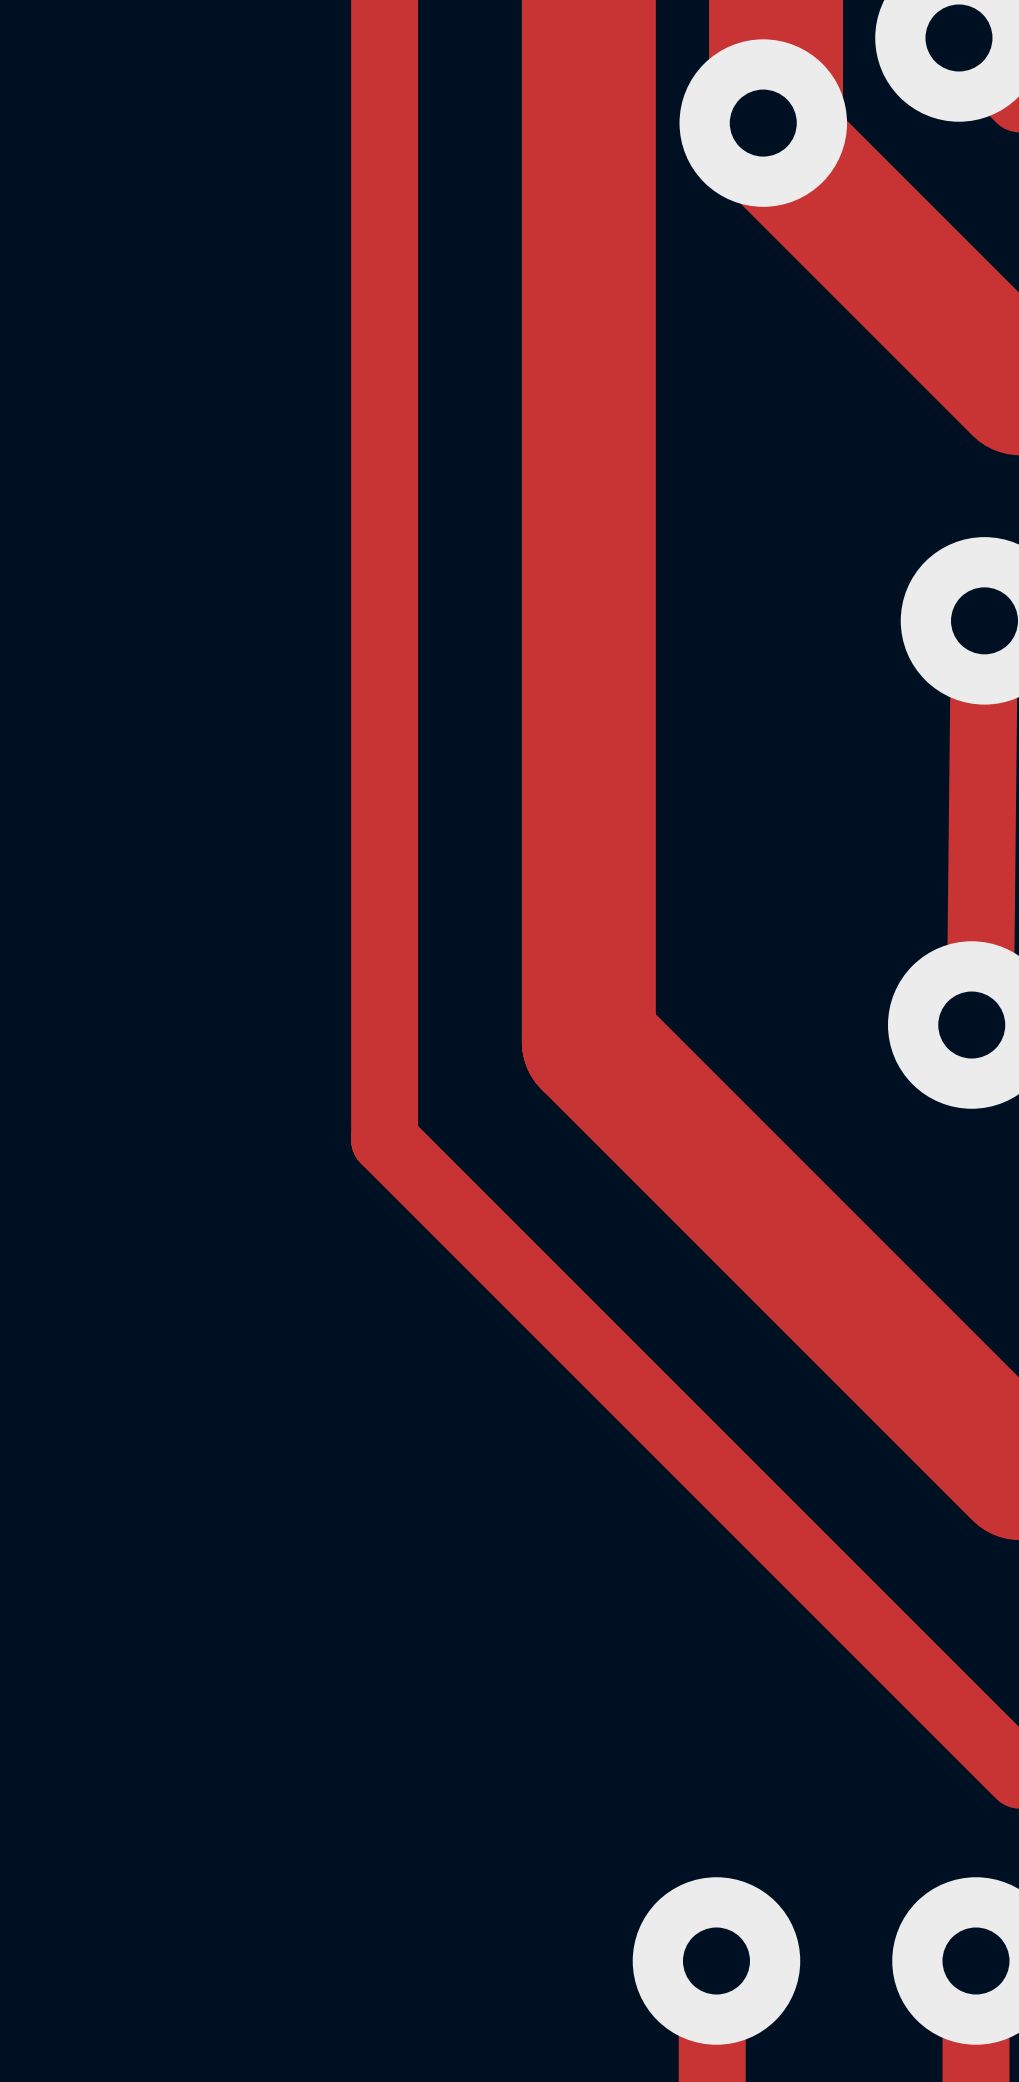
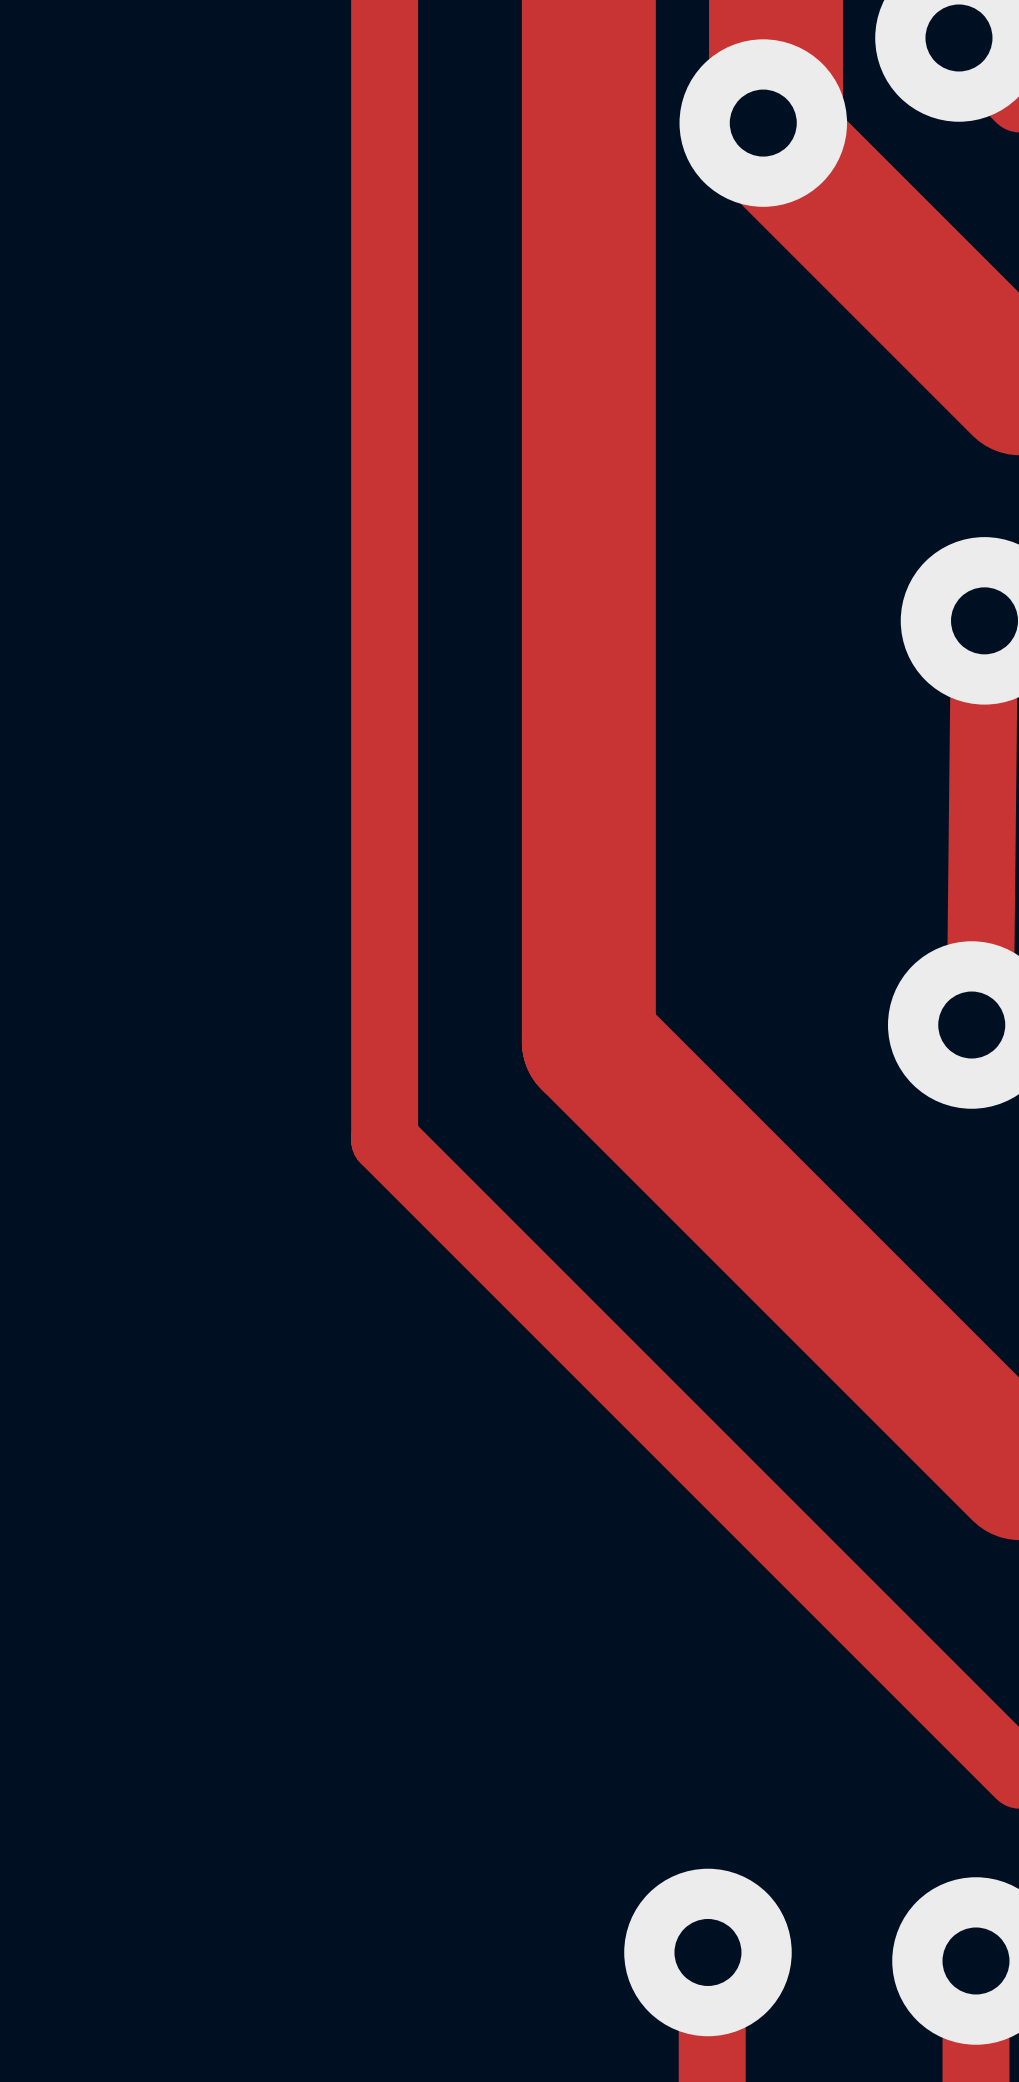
via position: (716, 1960) -> (707, 1952)

